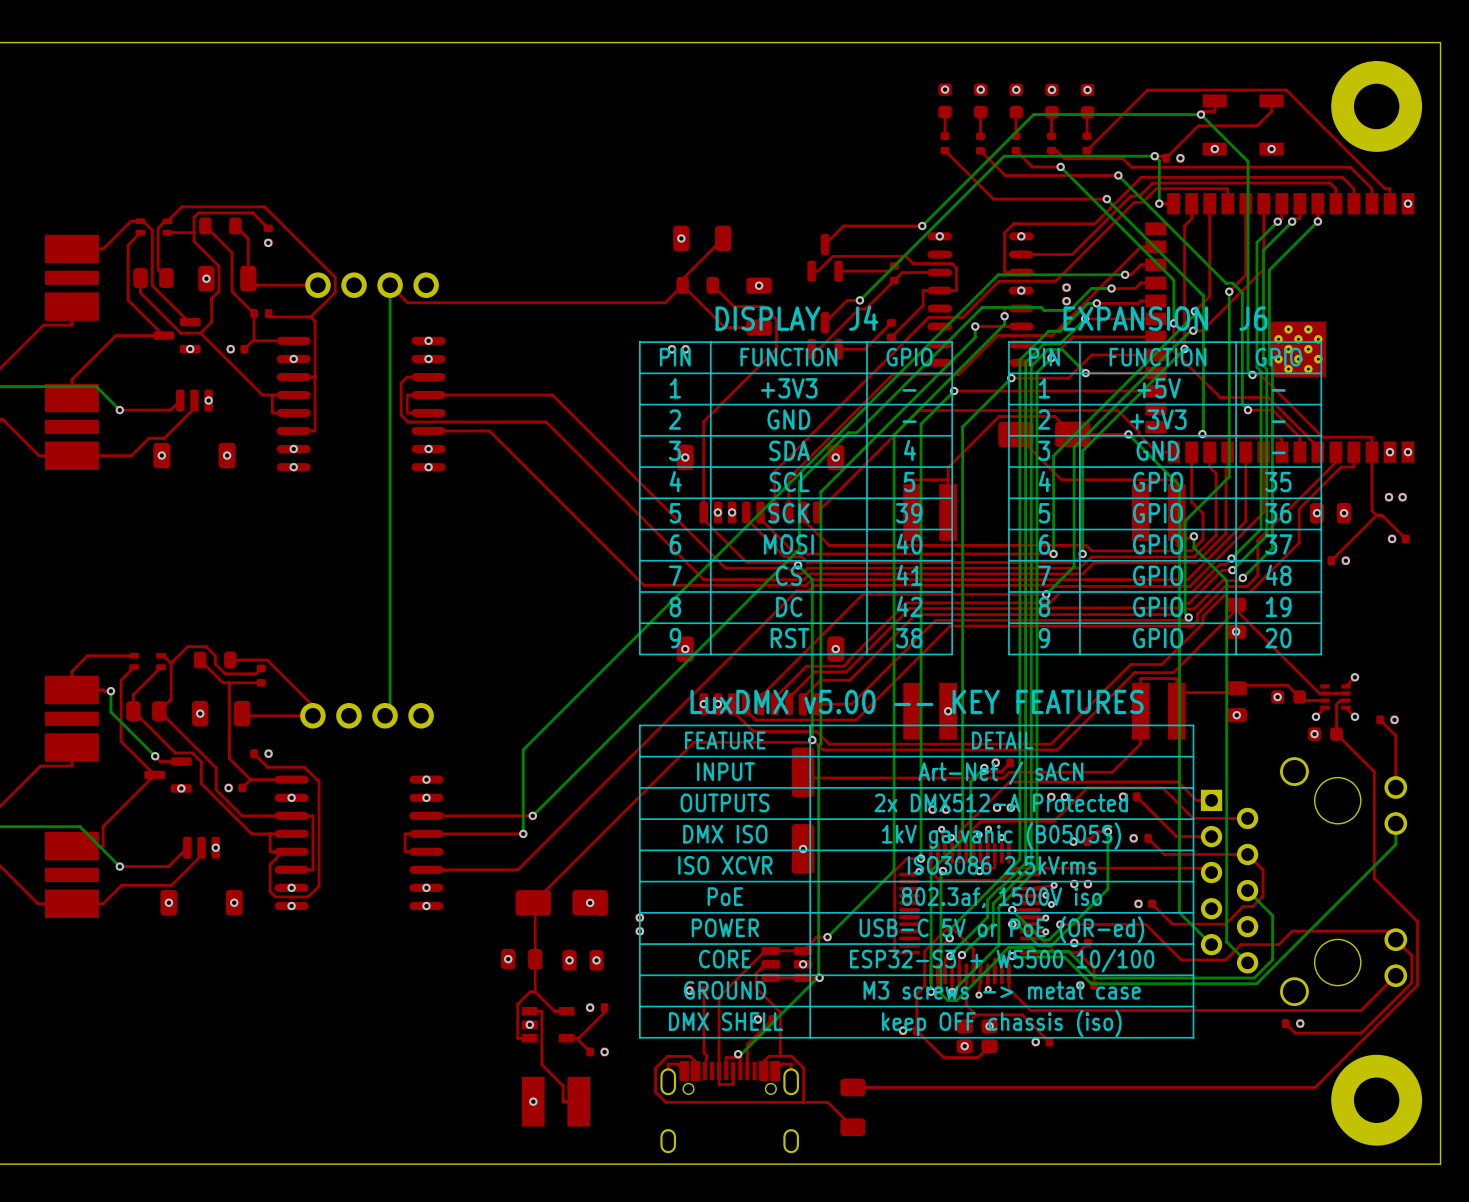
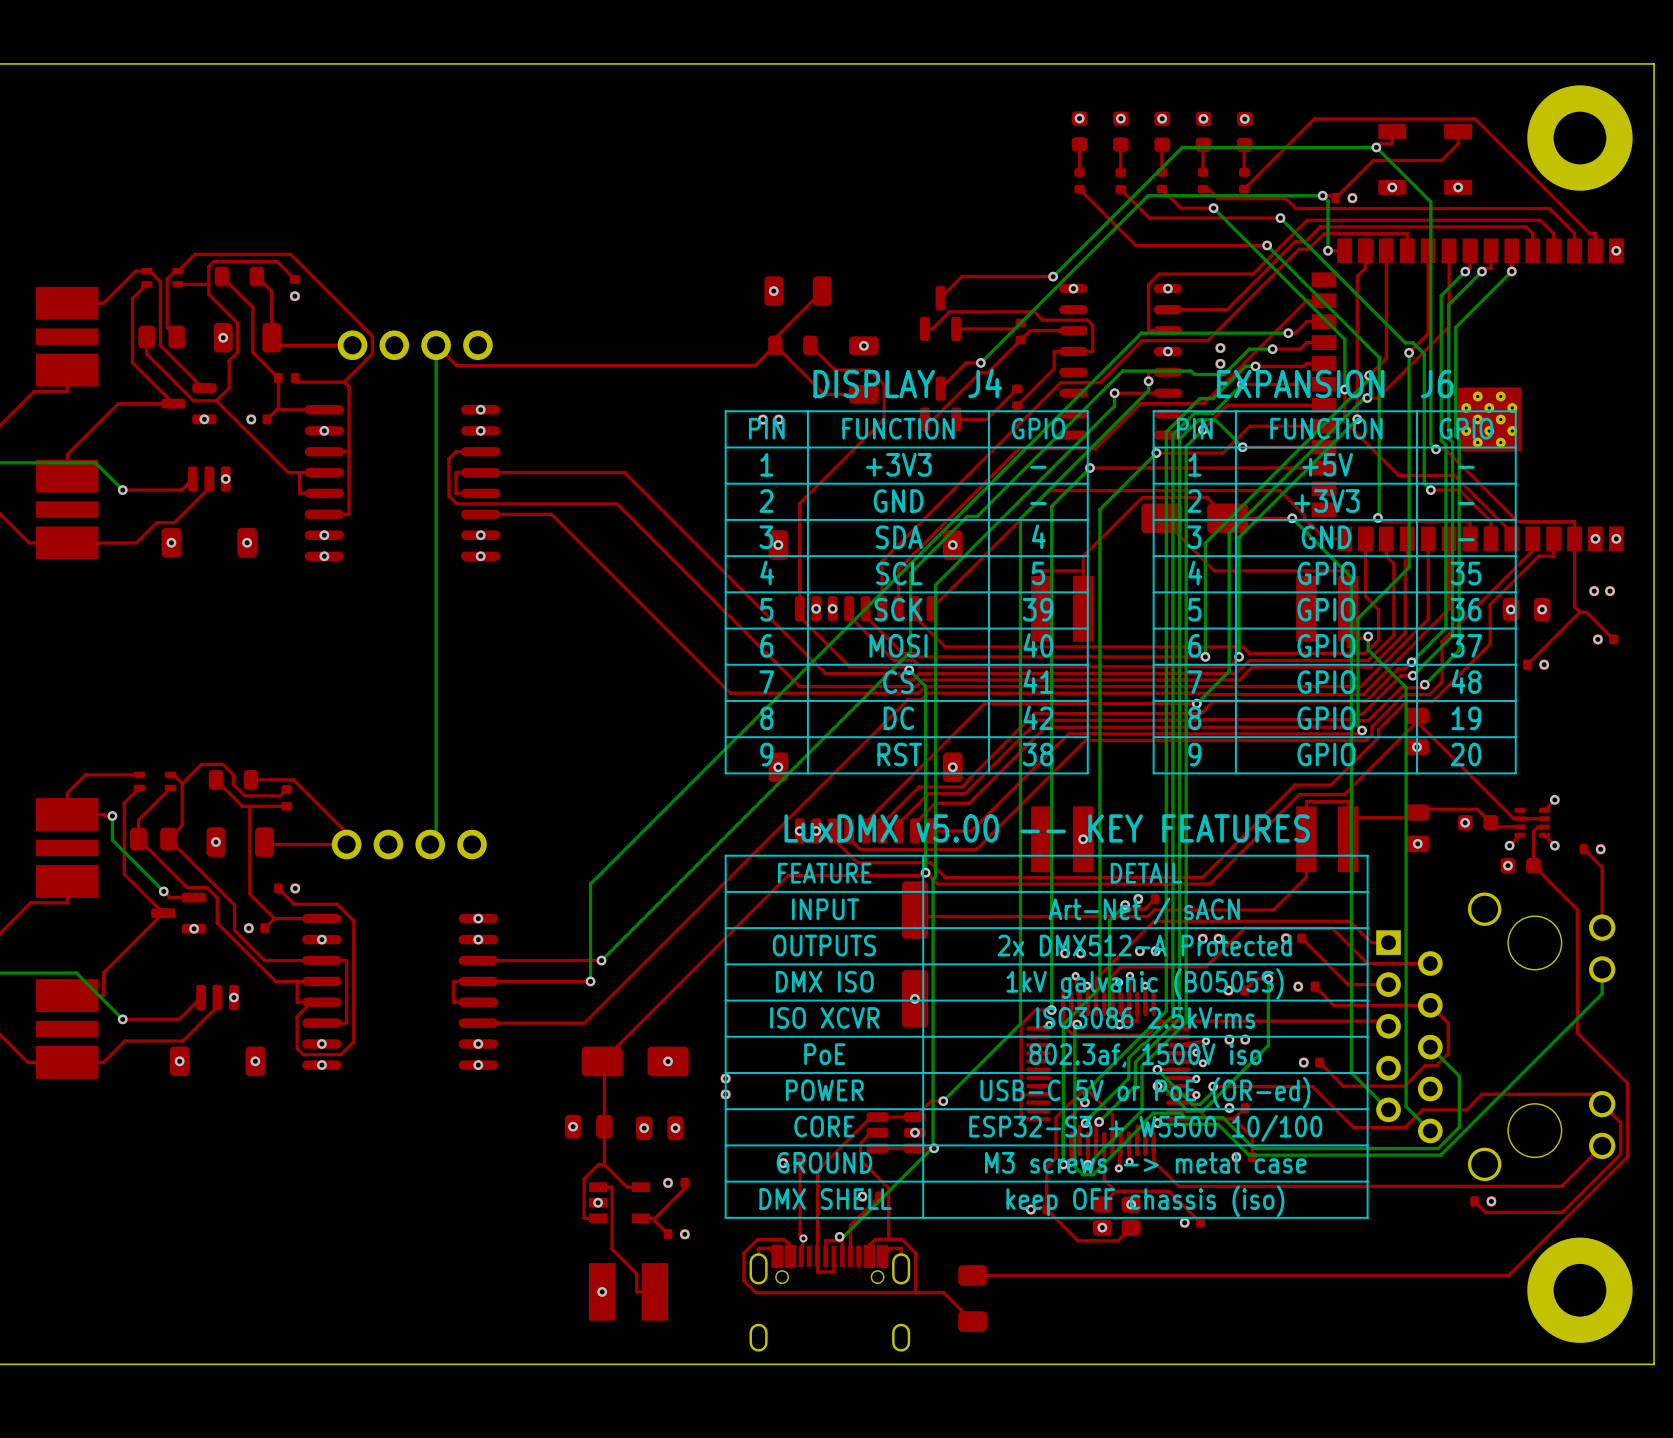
via: none -> (803, 1238)

